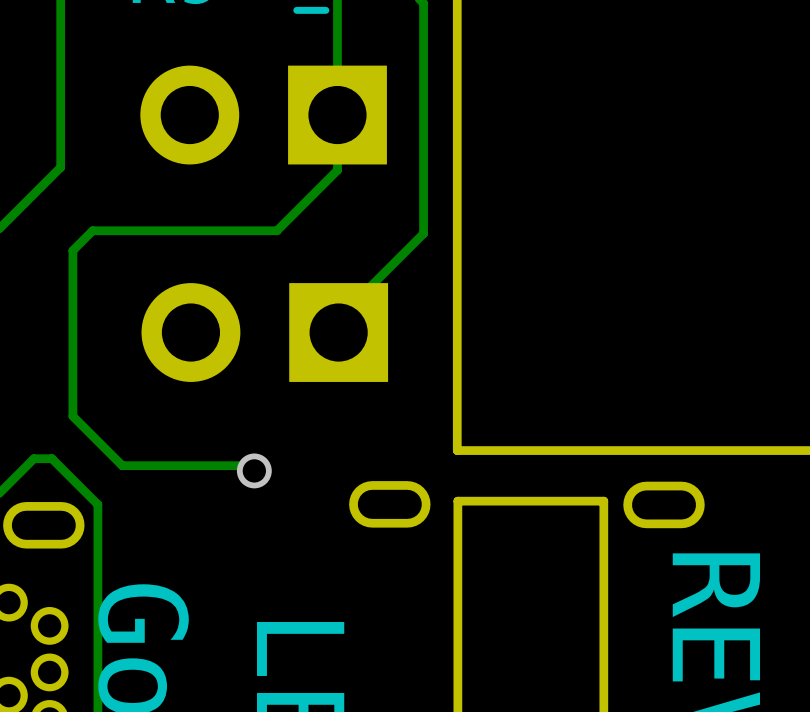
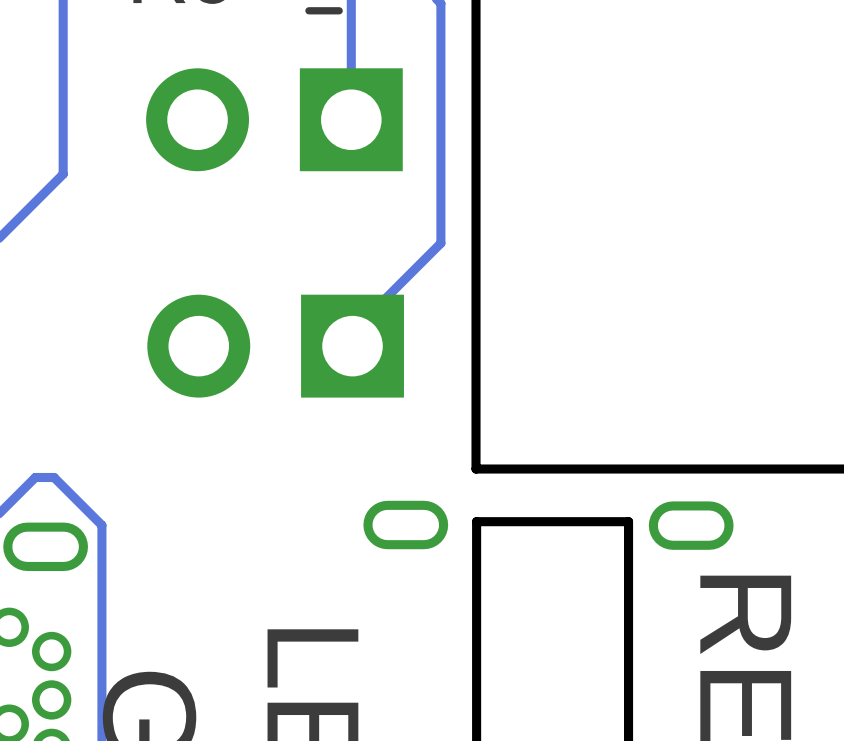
track: (337, 115) (337, 170) (277, 230) (92, 230) (72, 250) (72, 416) (122, 465) (249, 465) (254, 470) -> none
via: (254, 470) -> none

